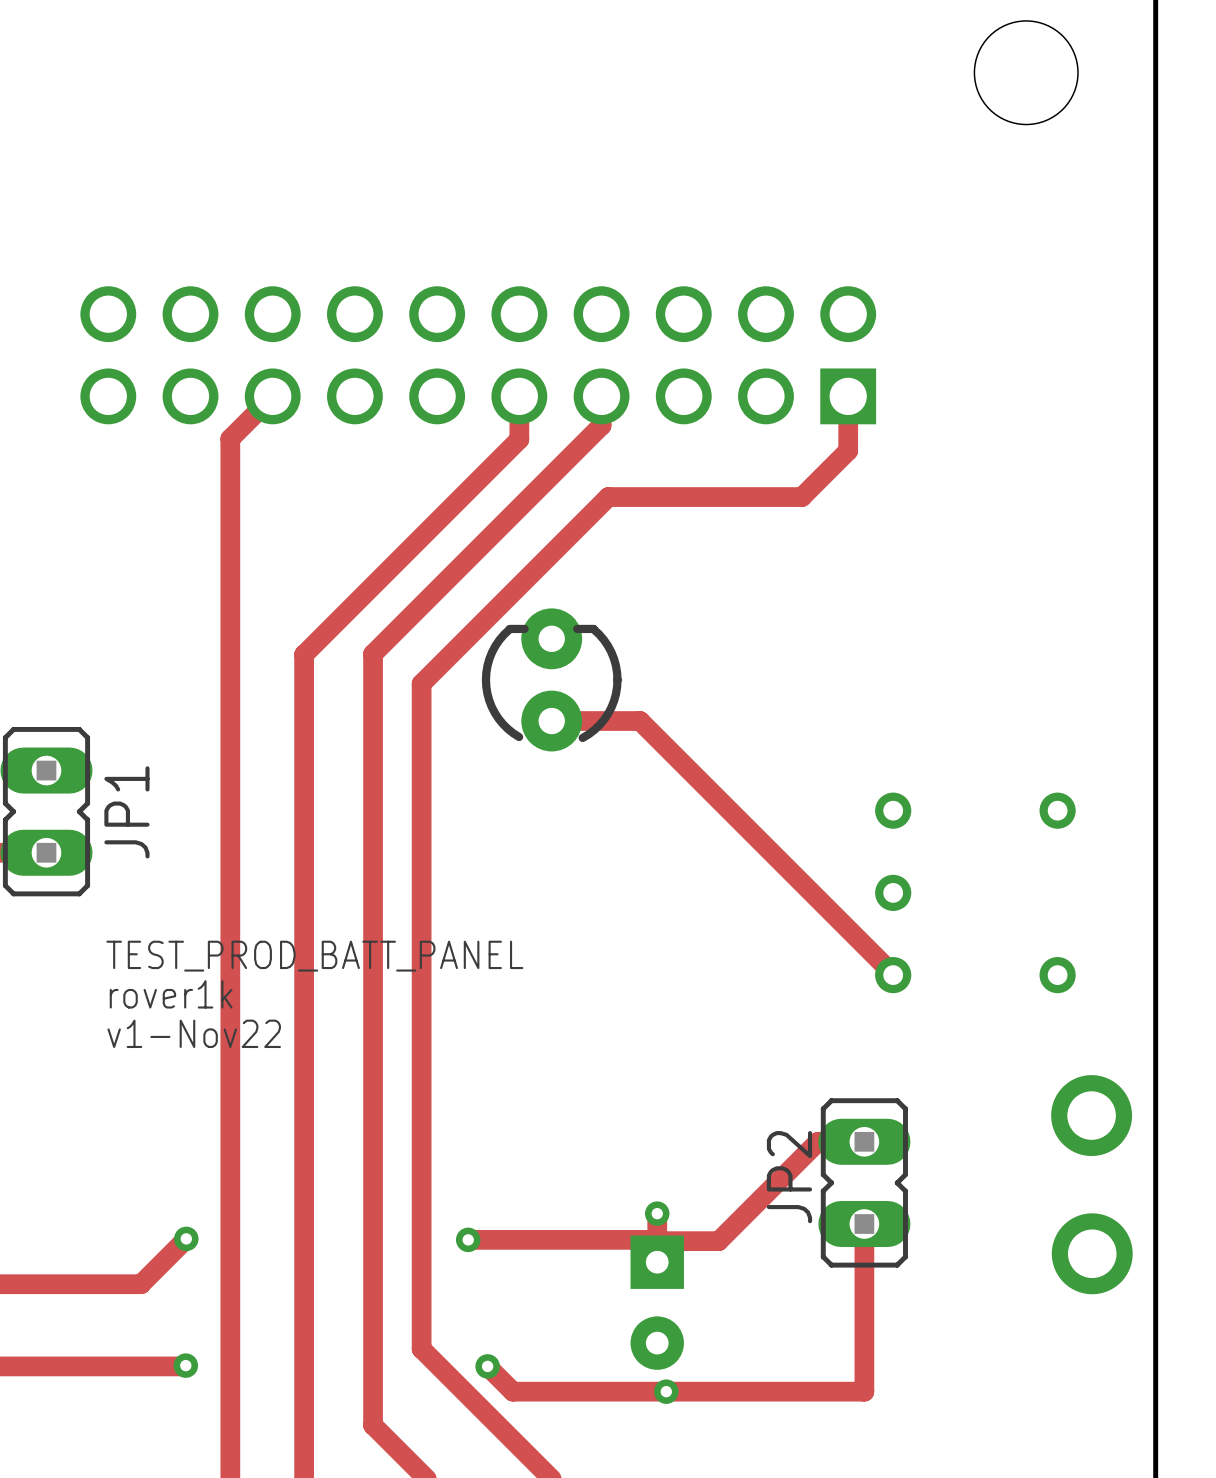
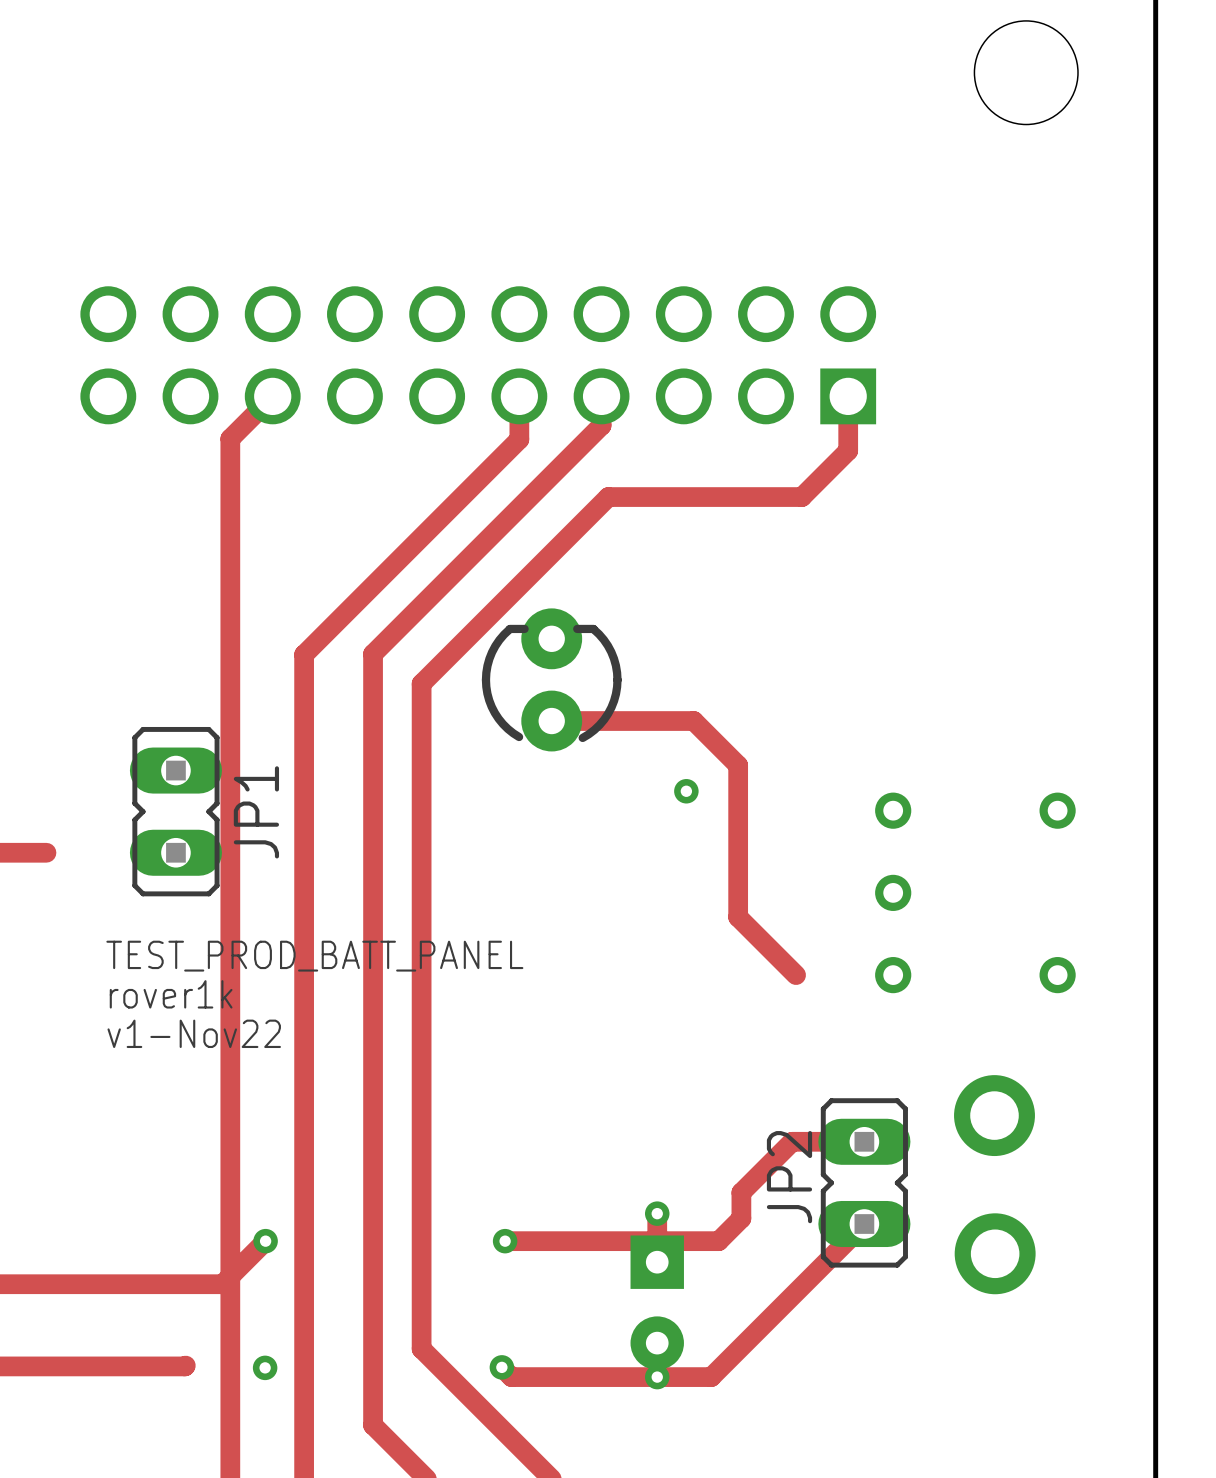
track: (640, 721) (893, 975) -> (640, 721) (693, 721) (738, 765) (738, 917) (796, 975)
via: none -> (686, 791)
JP1 position: (46, 811) -> (175, 811)
via: none -> (994, 1115)
via: (1091, 1115) -> none
track: (818, 1141) (741, 1218) -> (818, 1141) (792, 1141) (741, 1192) (741, 1218)
track: (864, 1224) (864, 1391) (512, 1391) (487, 1366) -> (864, 1224) (711, 1377) (511, 1377) (501, 1367)
track: (186, 1238) (140, 1284) -> (265, 1241) (222, 1284) (140, 1284)
via: (186, 1238) -> none
track: (468, 1239) (657, 1239) -> (505, 1241) (657, 1241)
via position: (468, 1239) -> (505, 1241)
via: none -> (265, 1241)
via: none -> (995, 1253)
via: (1092, 1253) -> none
via: (185, 1365) -> none
via position: (487, 1366) -> (501, 1367)
via: none -> (265, 1367)
via position: (666, 1391) -> (657, 1377)

